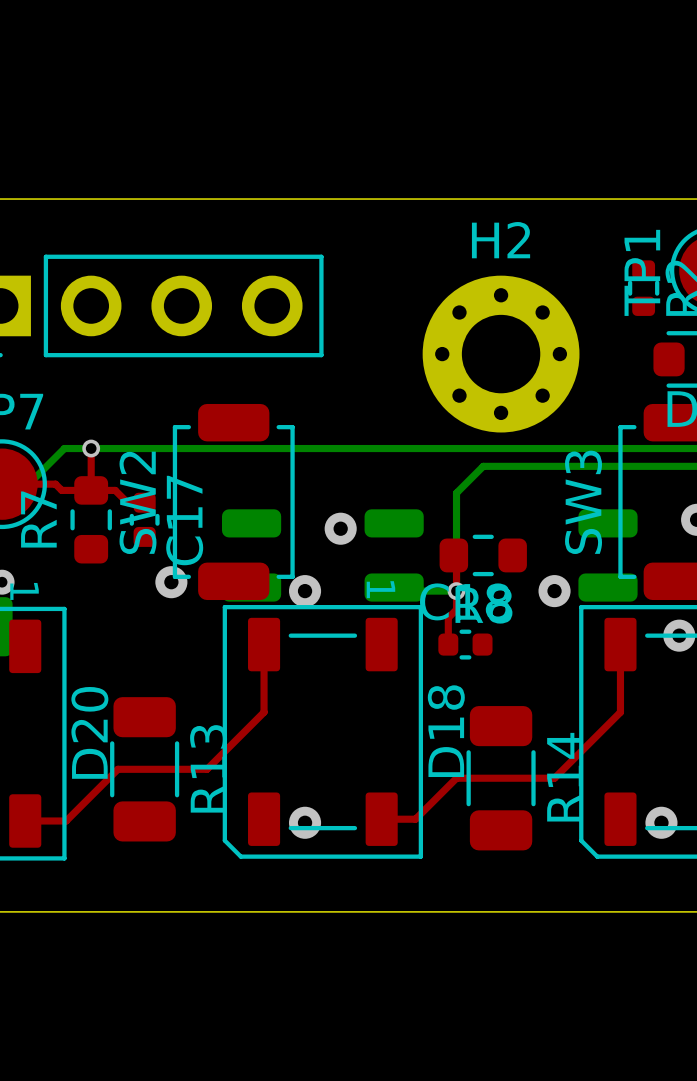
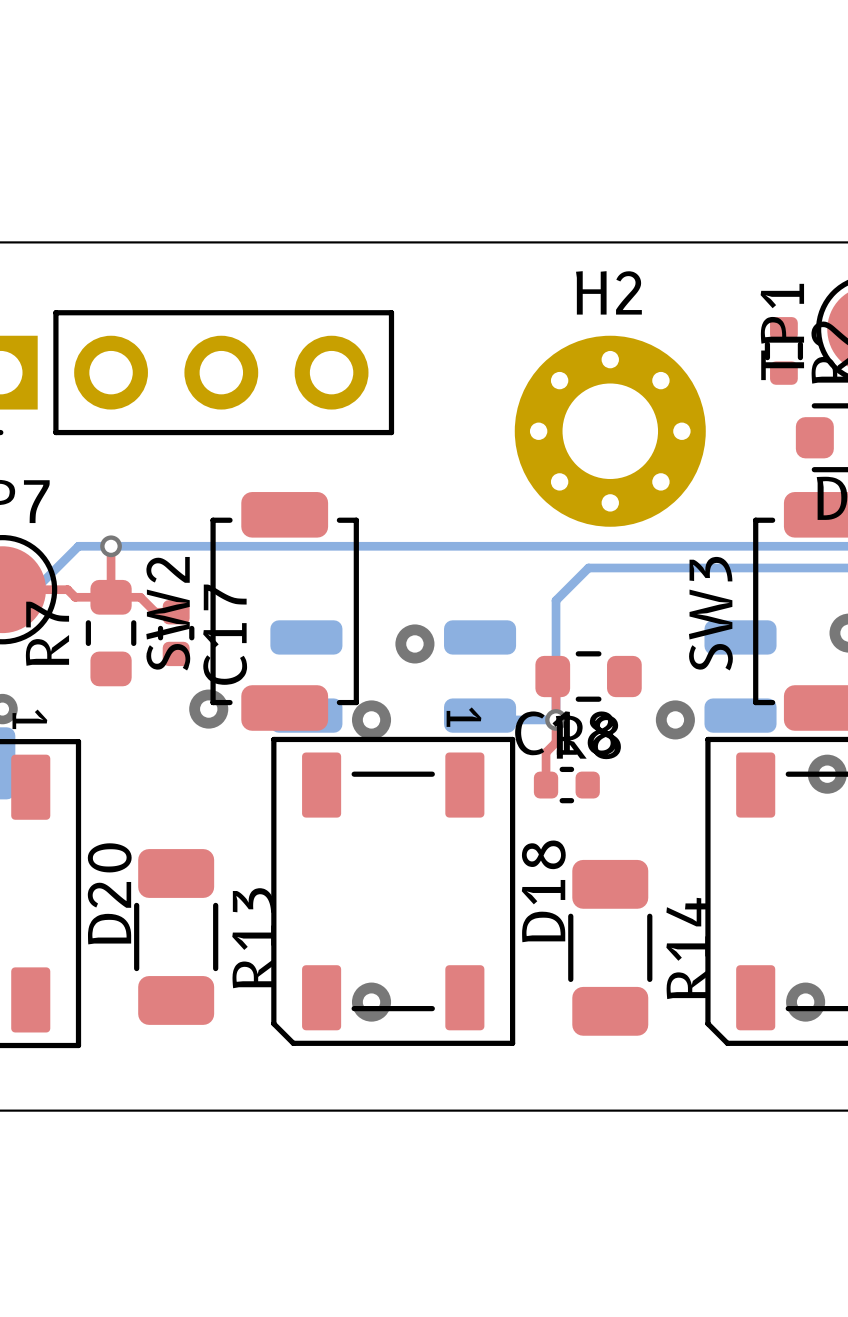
top track: (264, 644) (264, 712) (207, 769) (117, 769) (66, 820) (25, 820) -> none
top track: (620, 644) (620, 712) (554, 778) (456, 778) (415, 819) (381, 819) -> none

